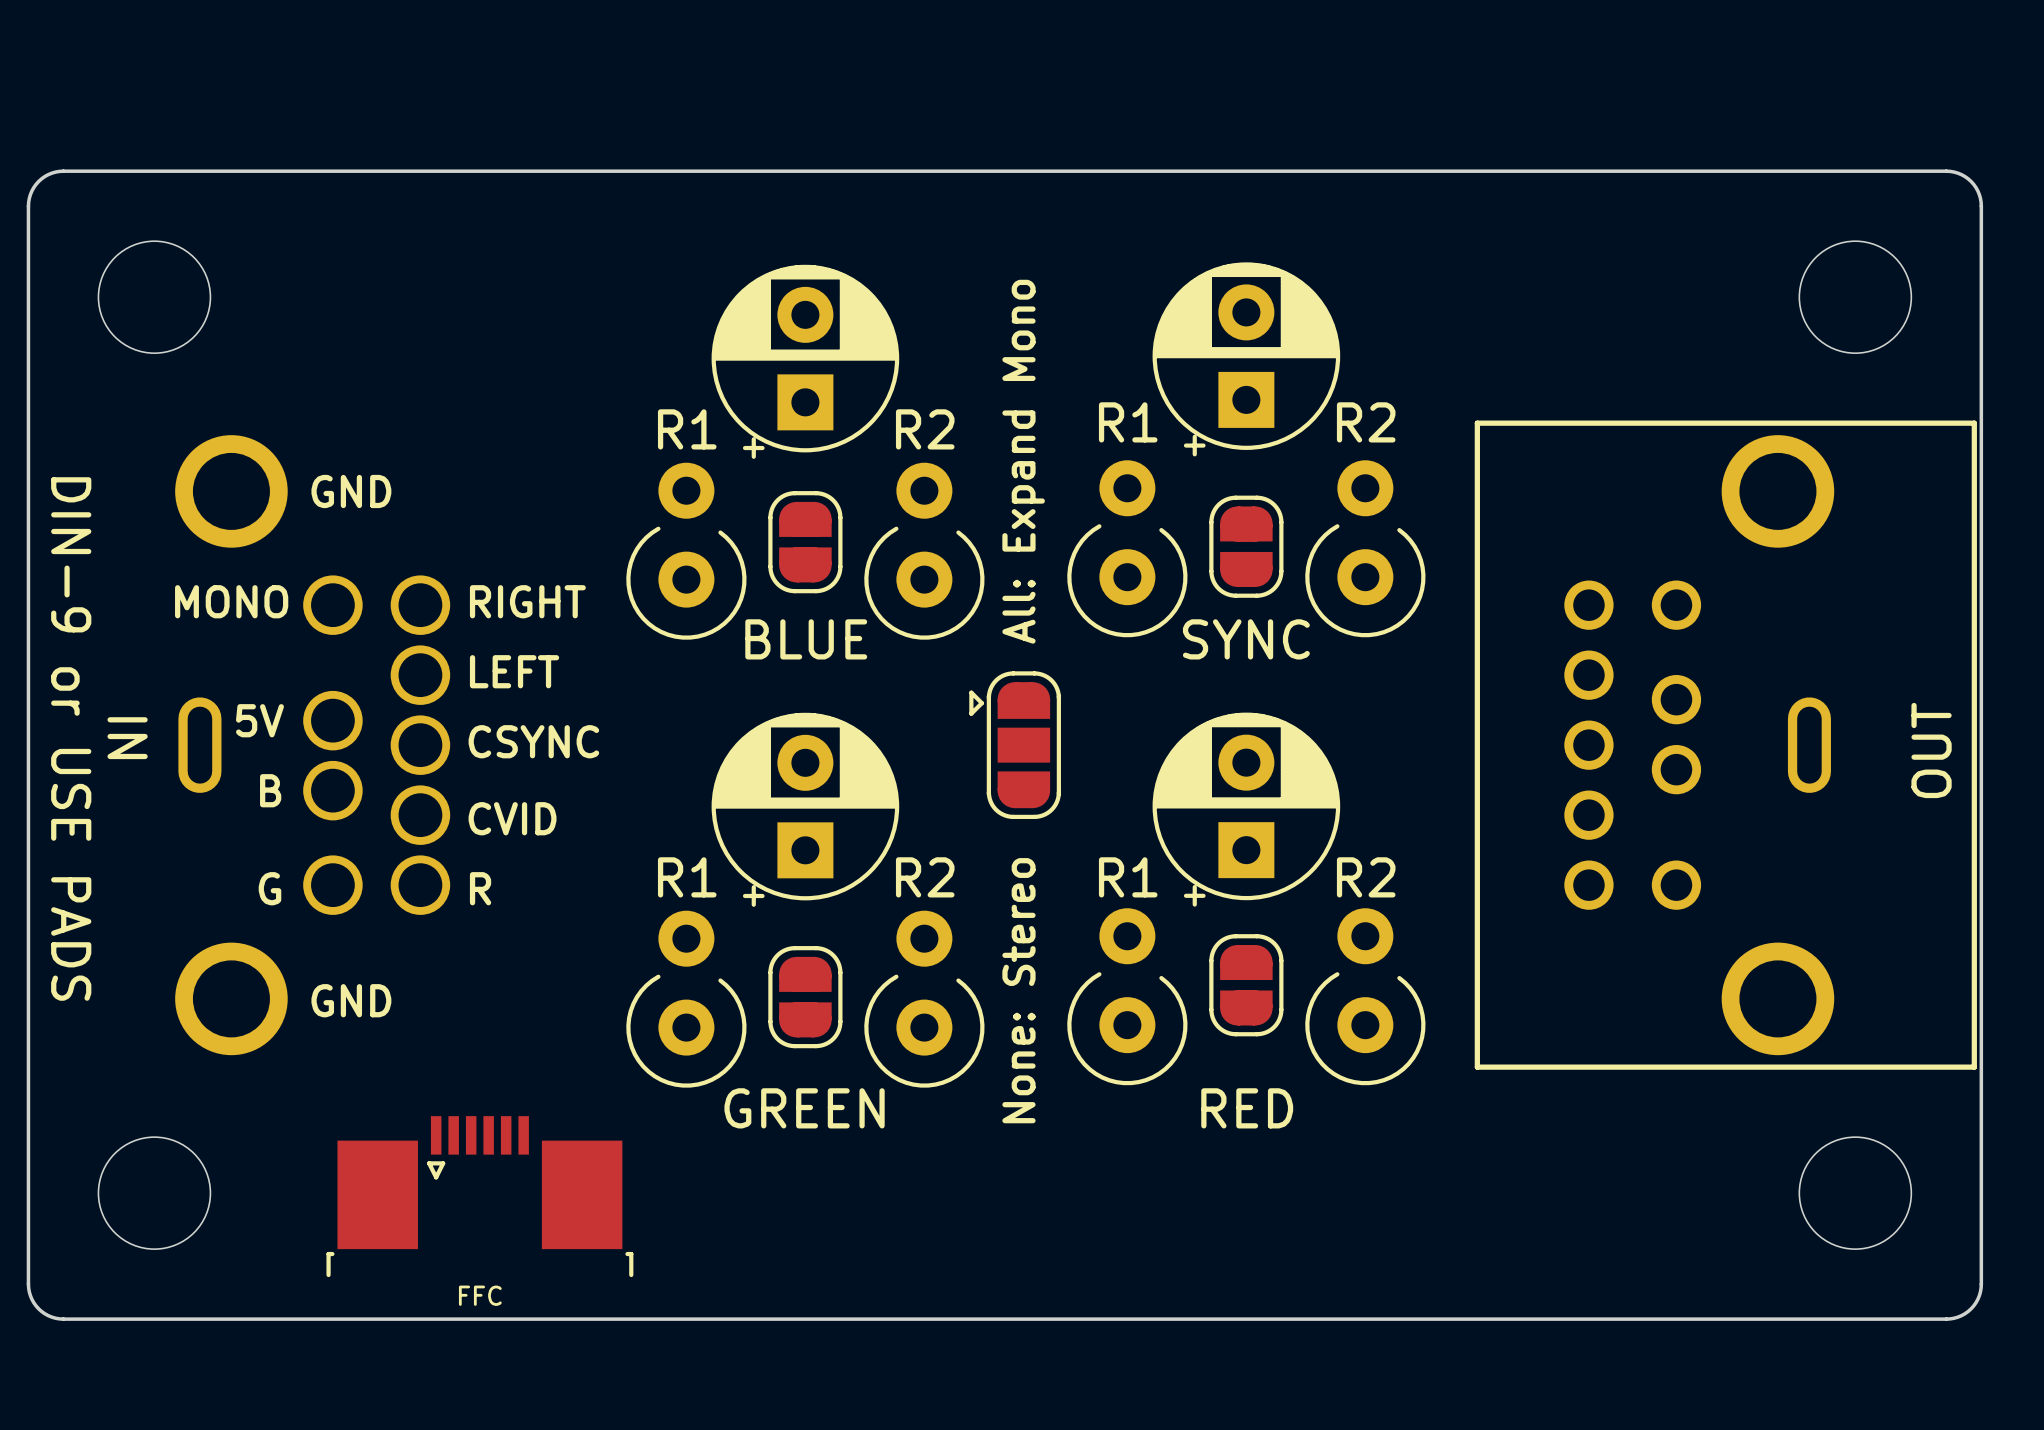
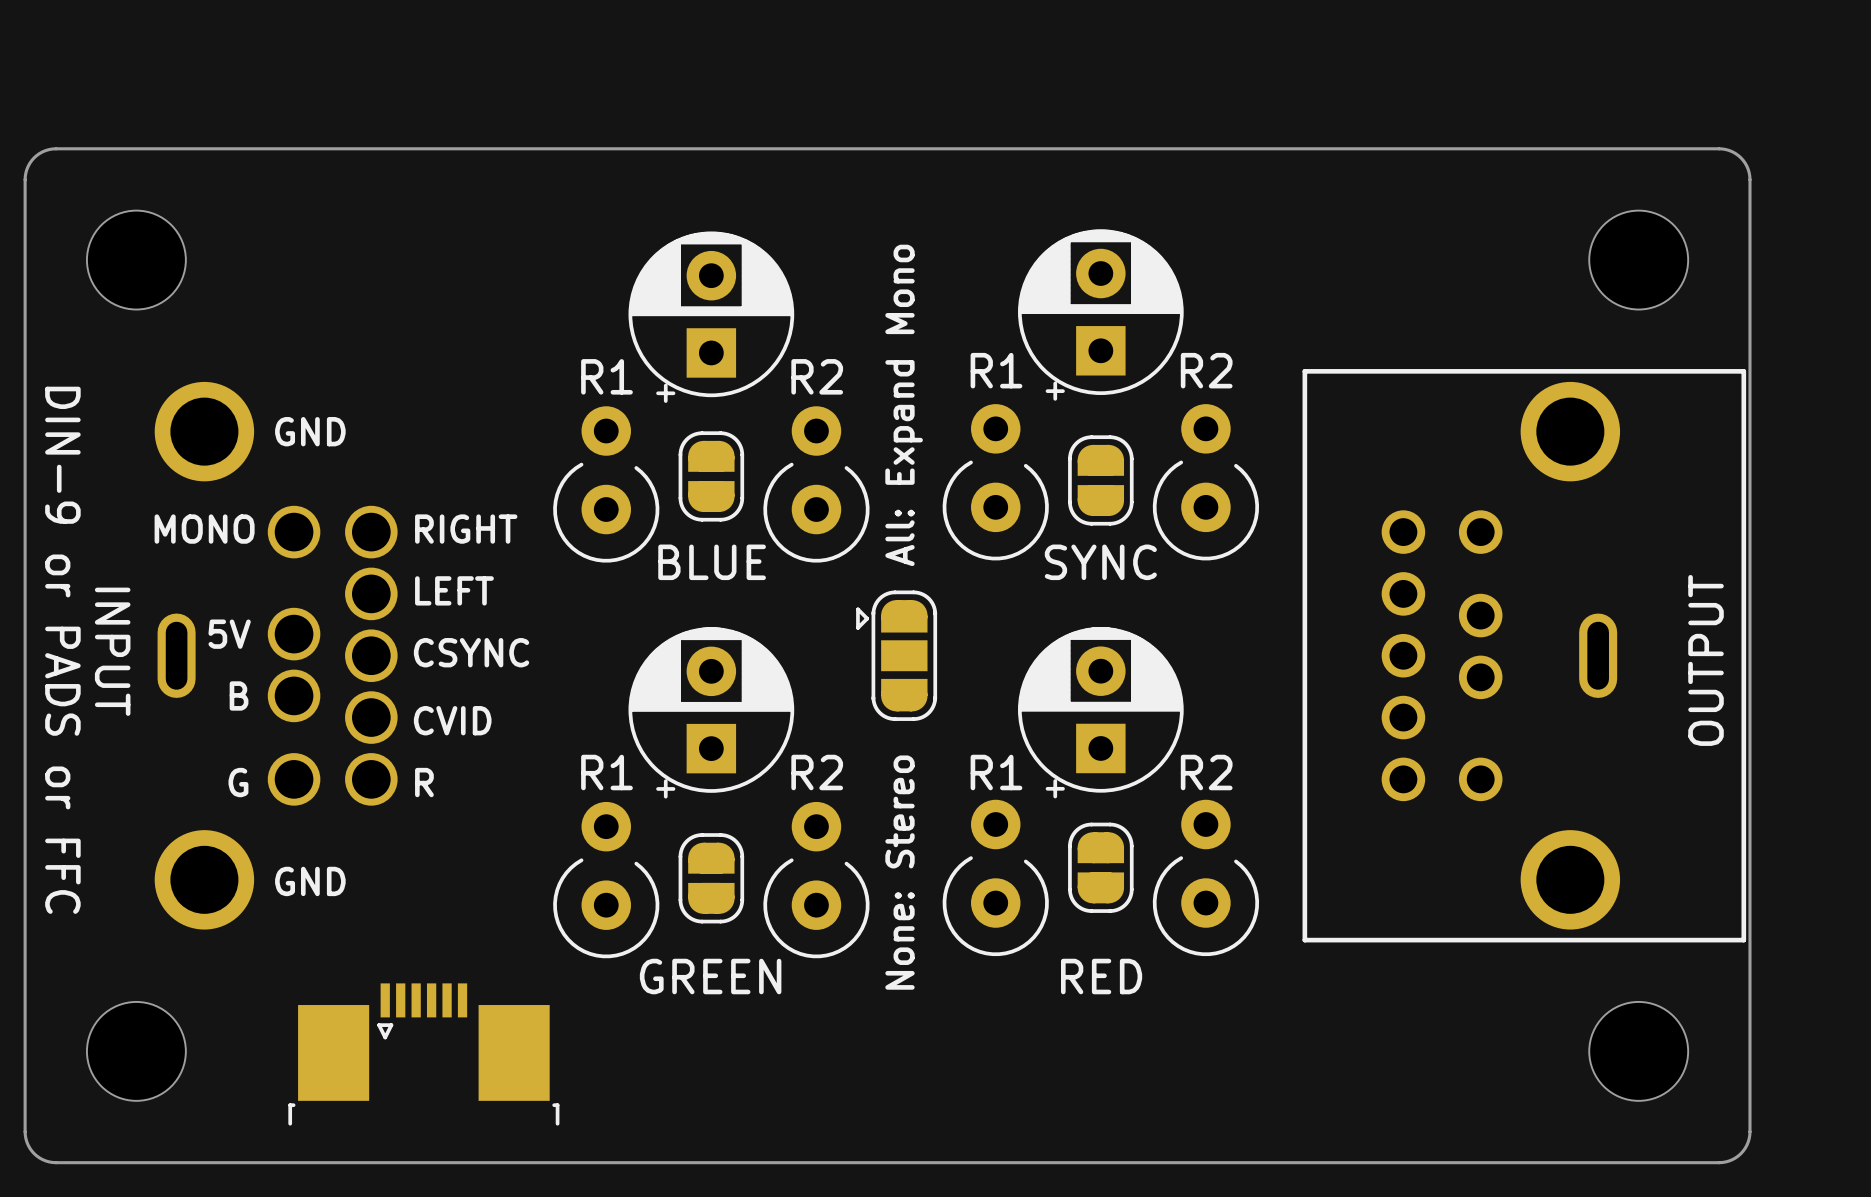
text: DIN-9 or USE PADS (71, 738) -> DIN-9 or PADS or FFC (62, 650)
text: IN (127, 738) -> INPUT (112, 651)
text: OUT (1931, 750) -> OUTPUT (1706, 660)
part value: FFC (480, 1295) -> none

